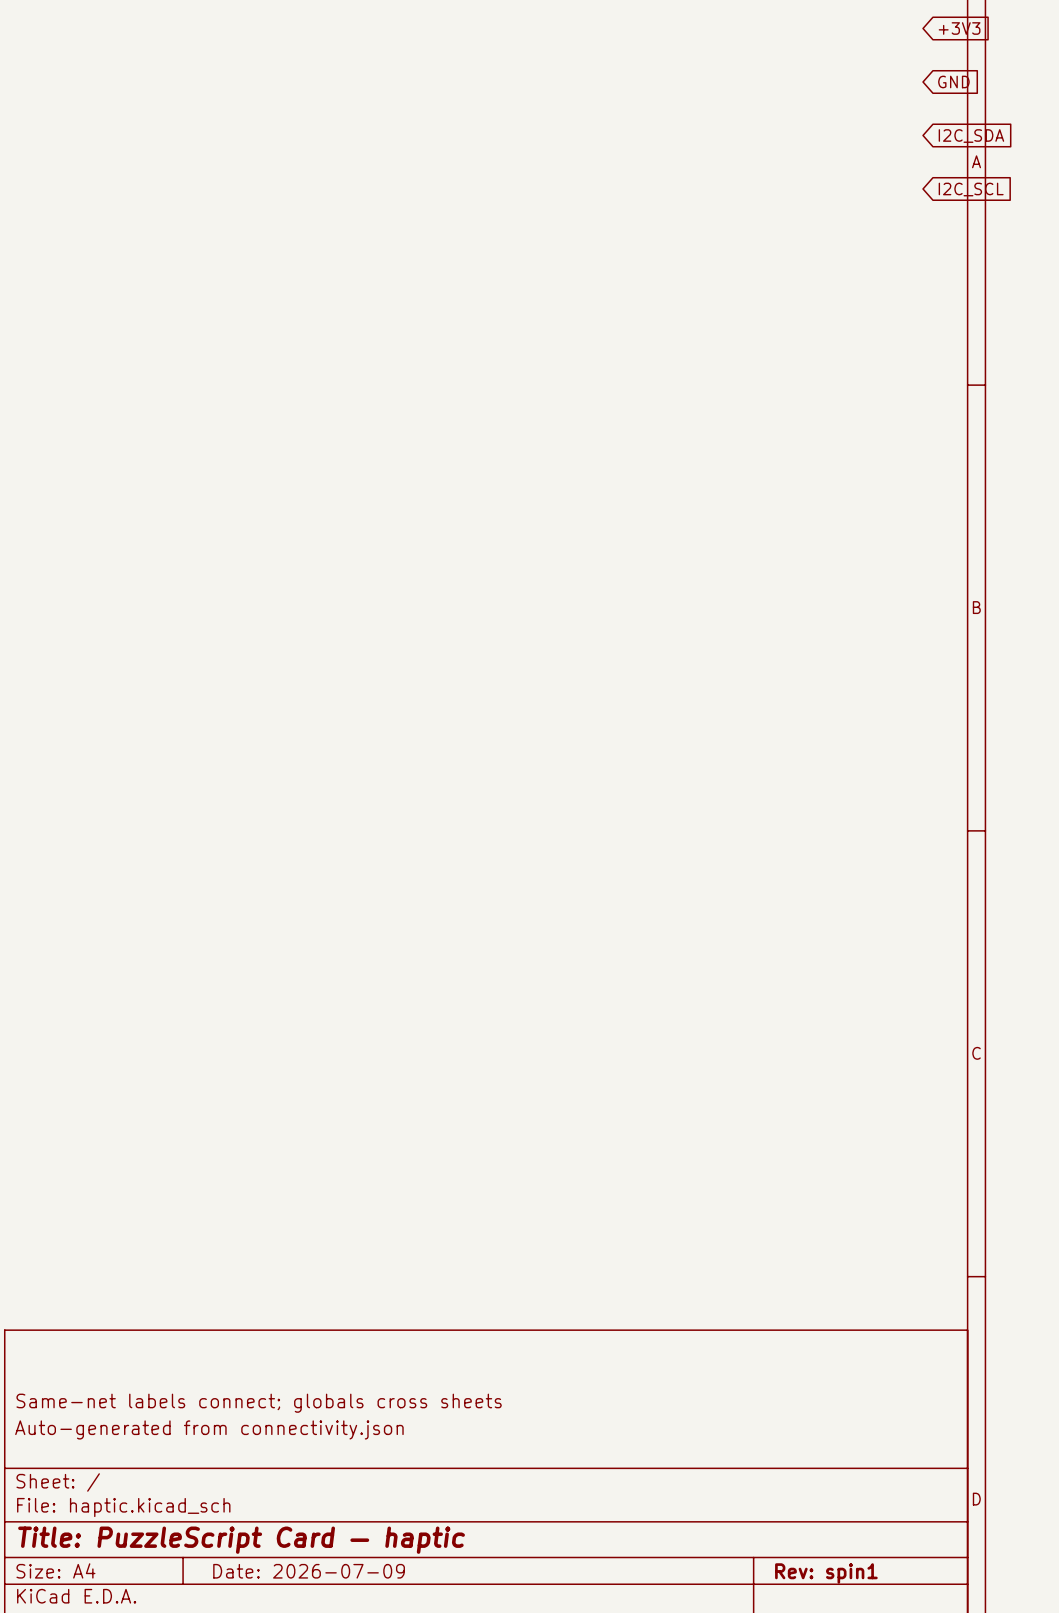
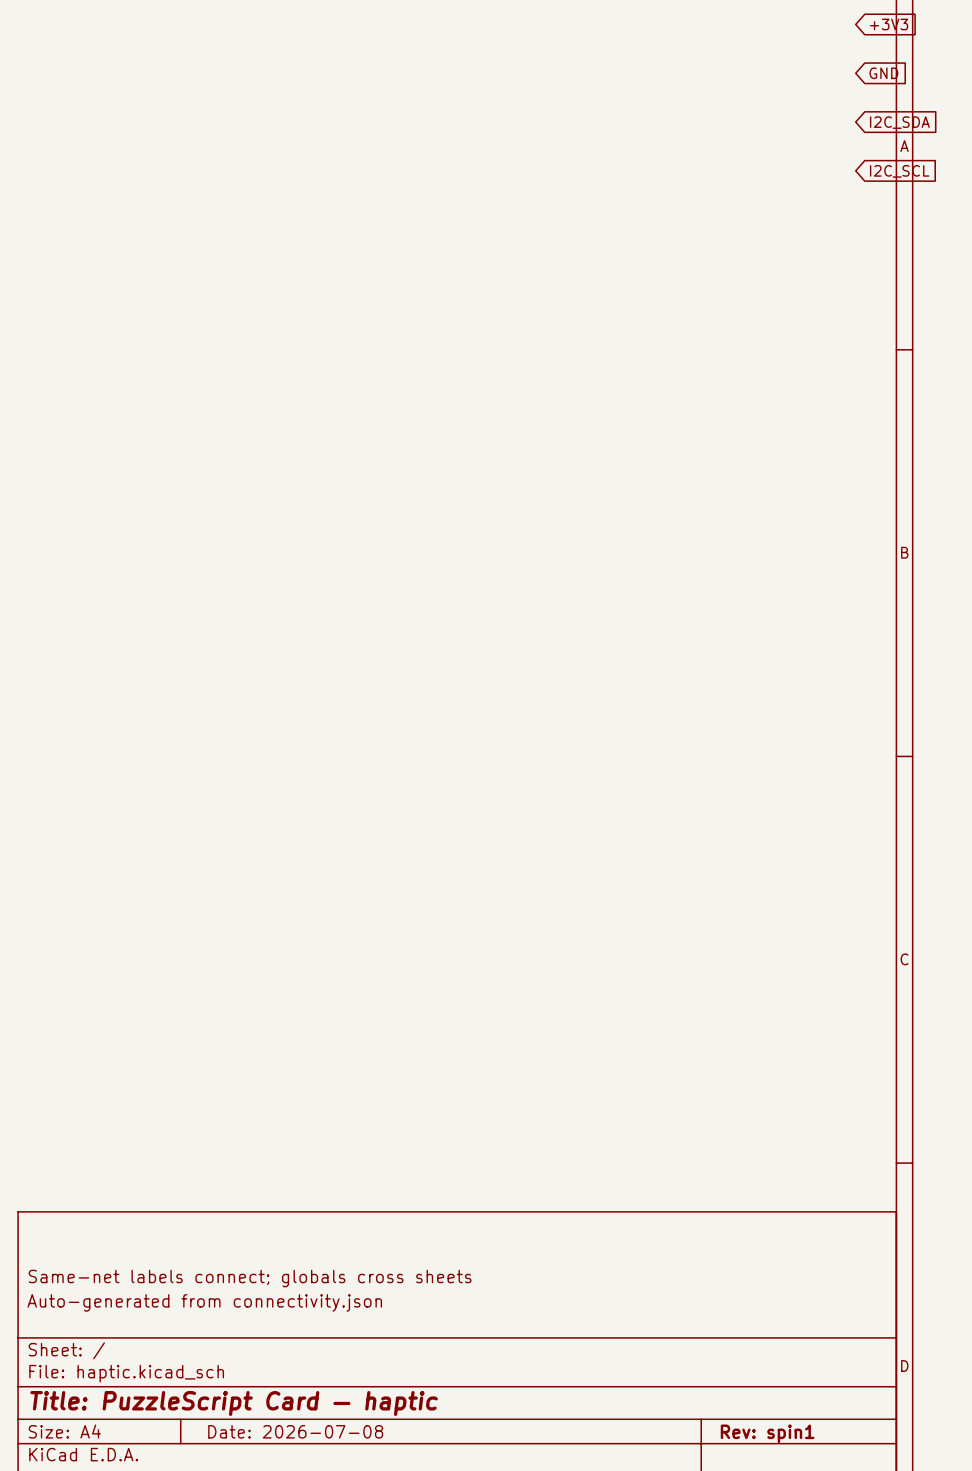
title block: Date: 2026-07-09 (309, 1571) -> Date: 2026-07-08 (295, 1431)

